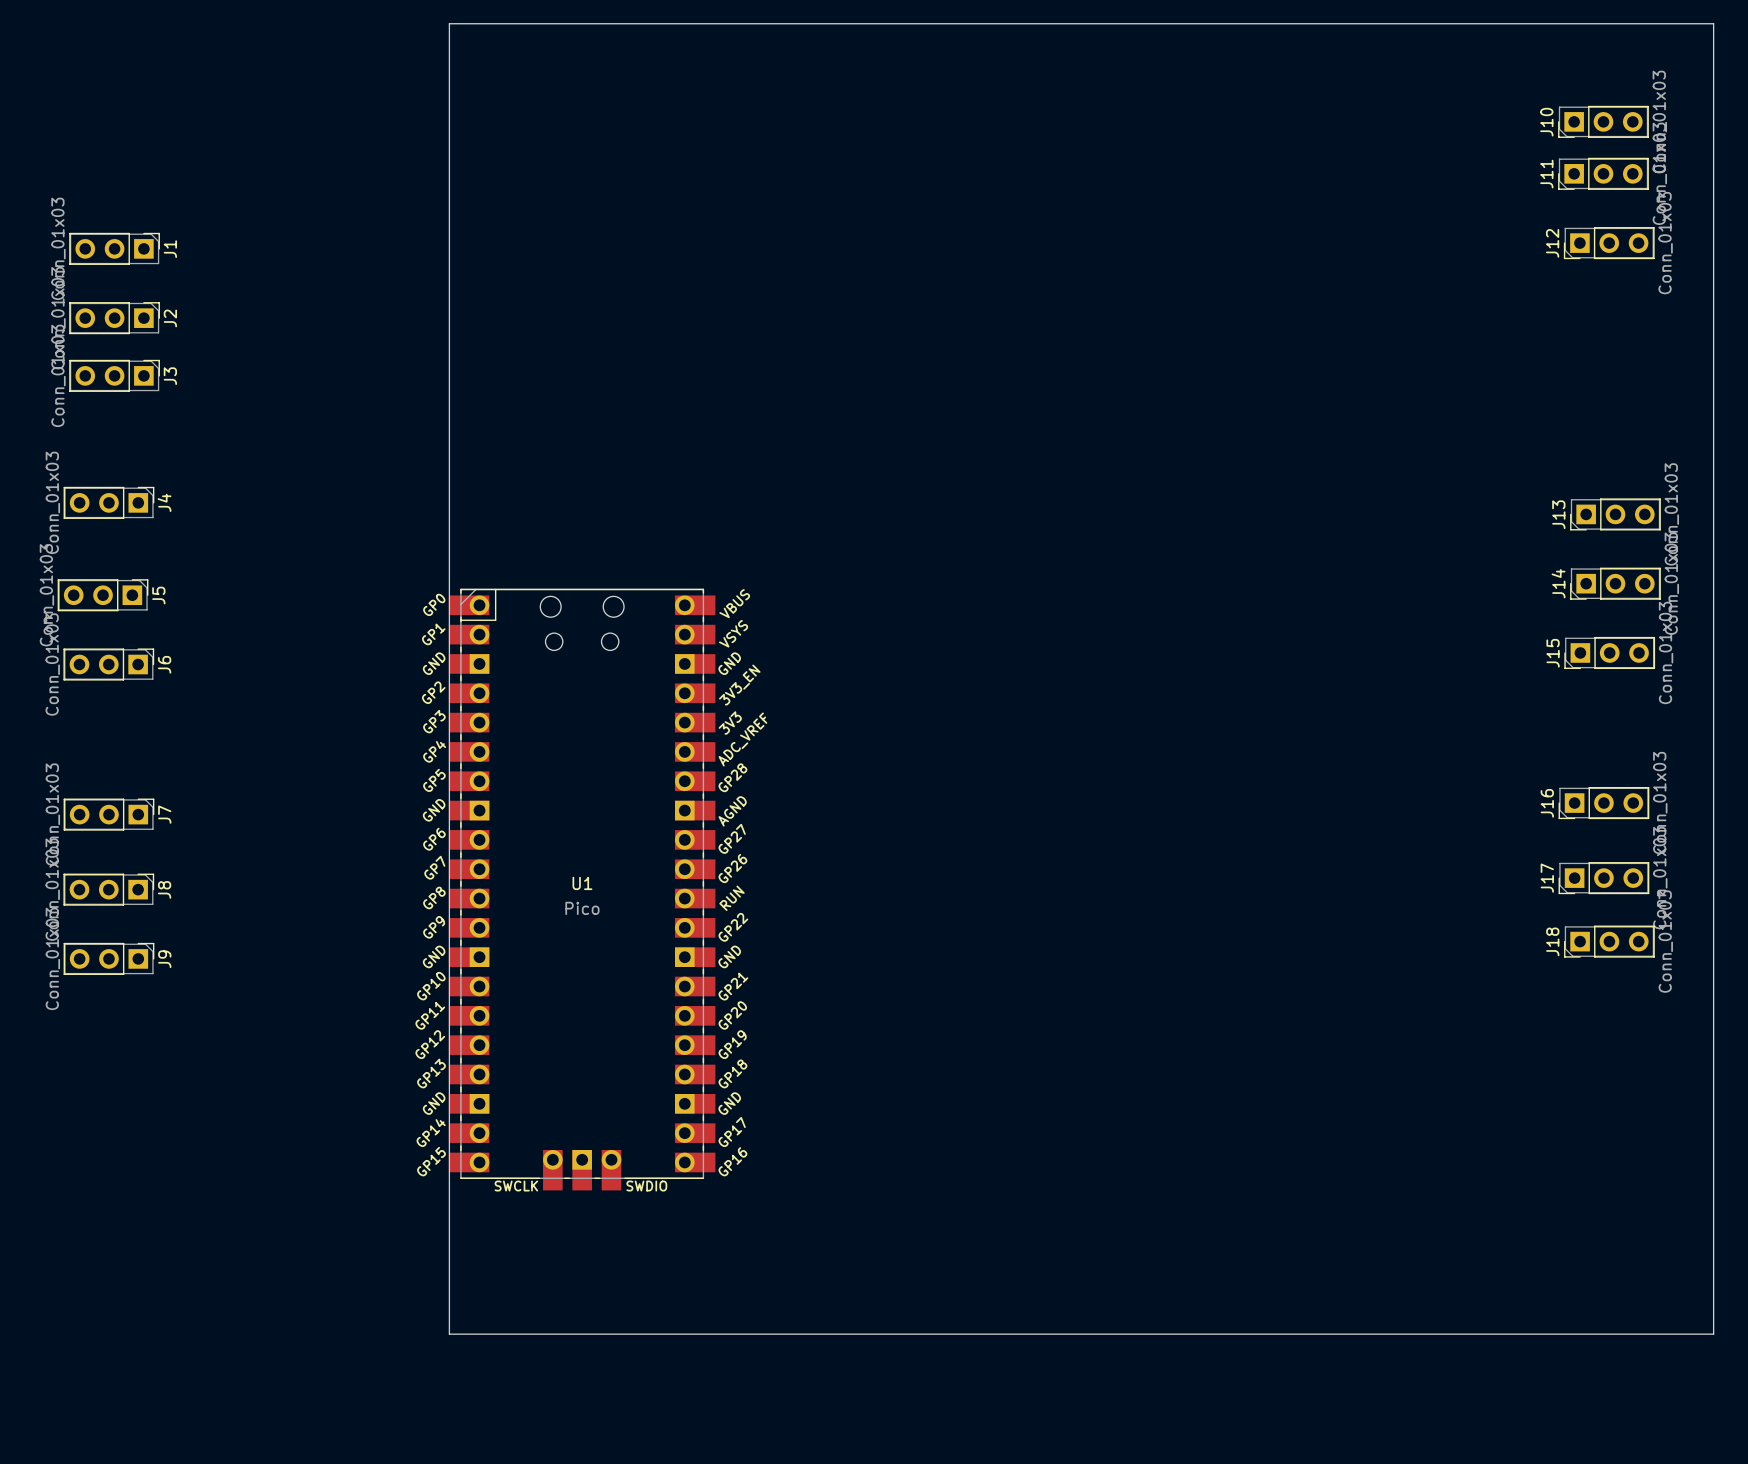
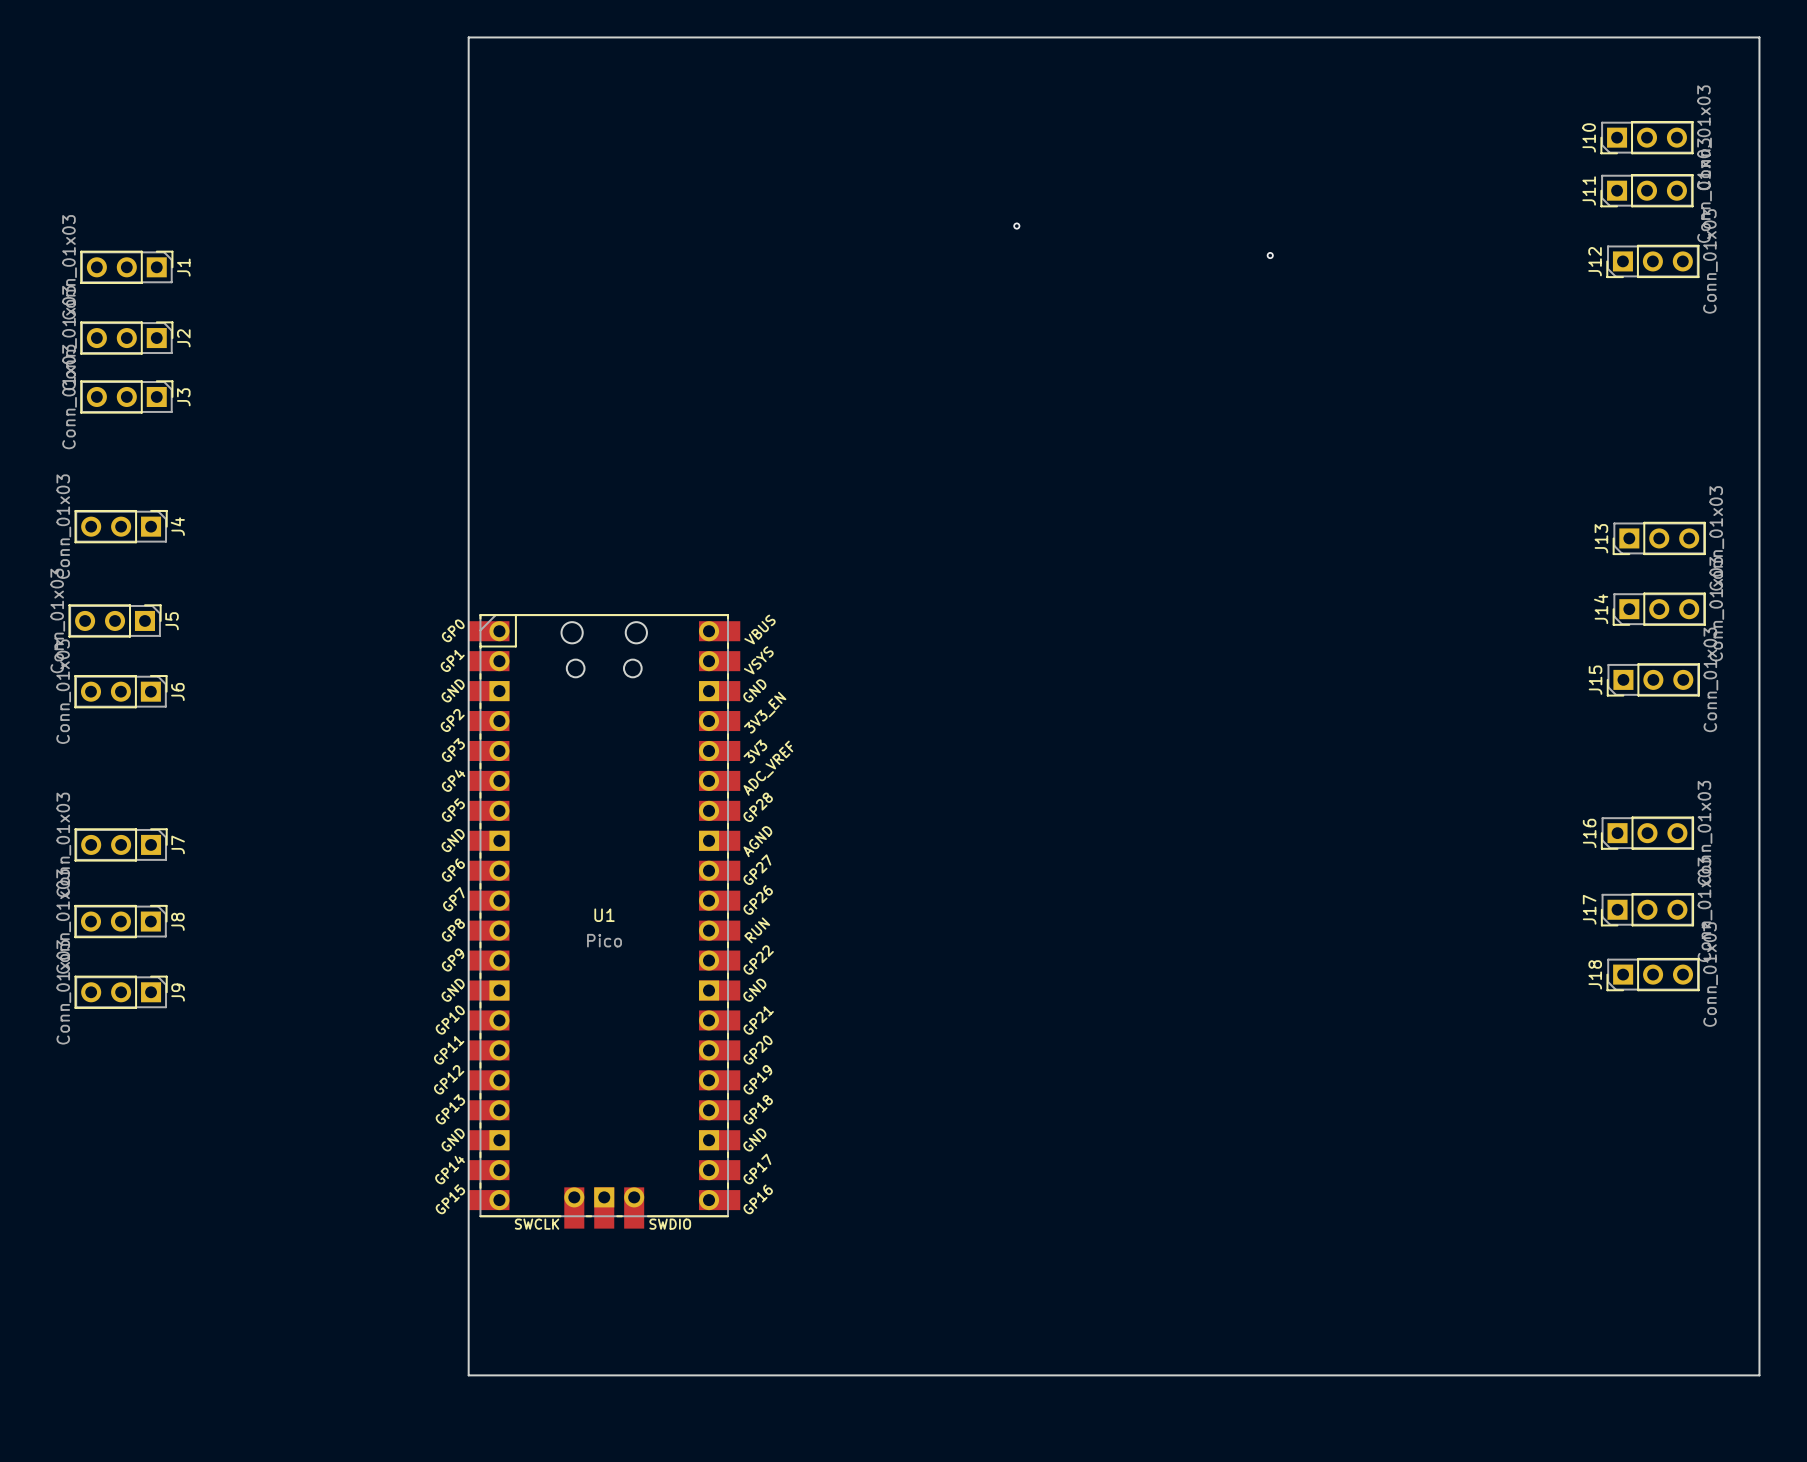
via: none -> (1016, 226)
via: none -> (1270, 255)

